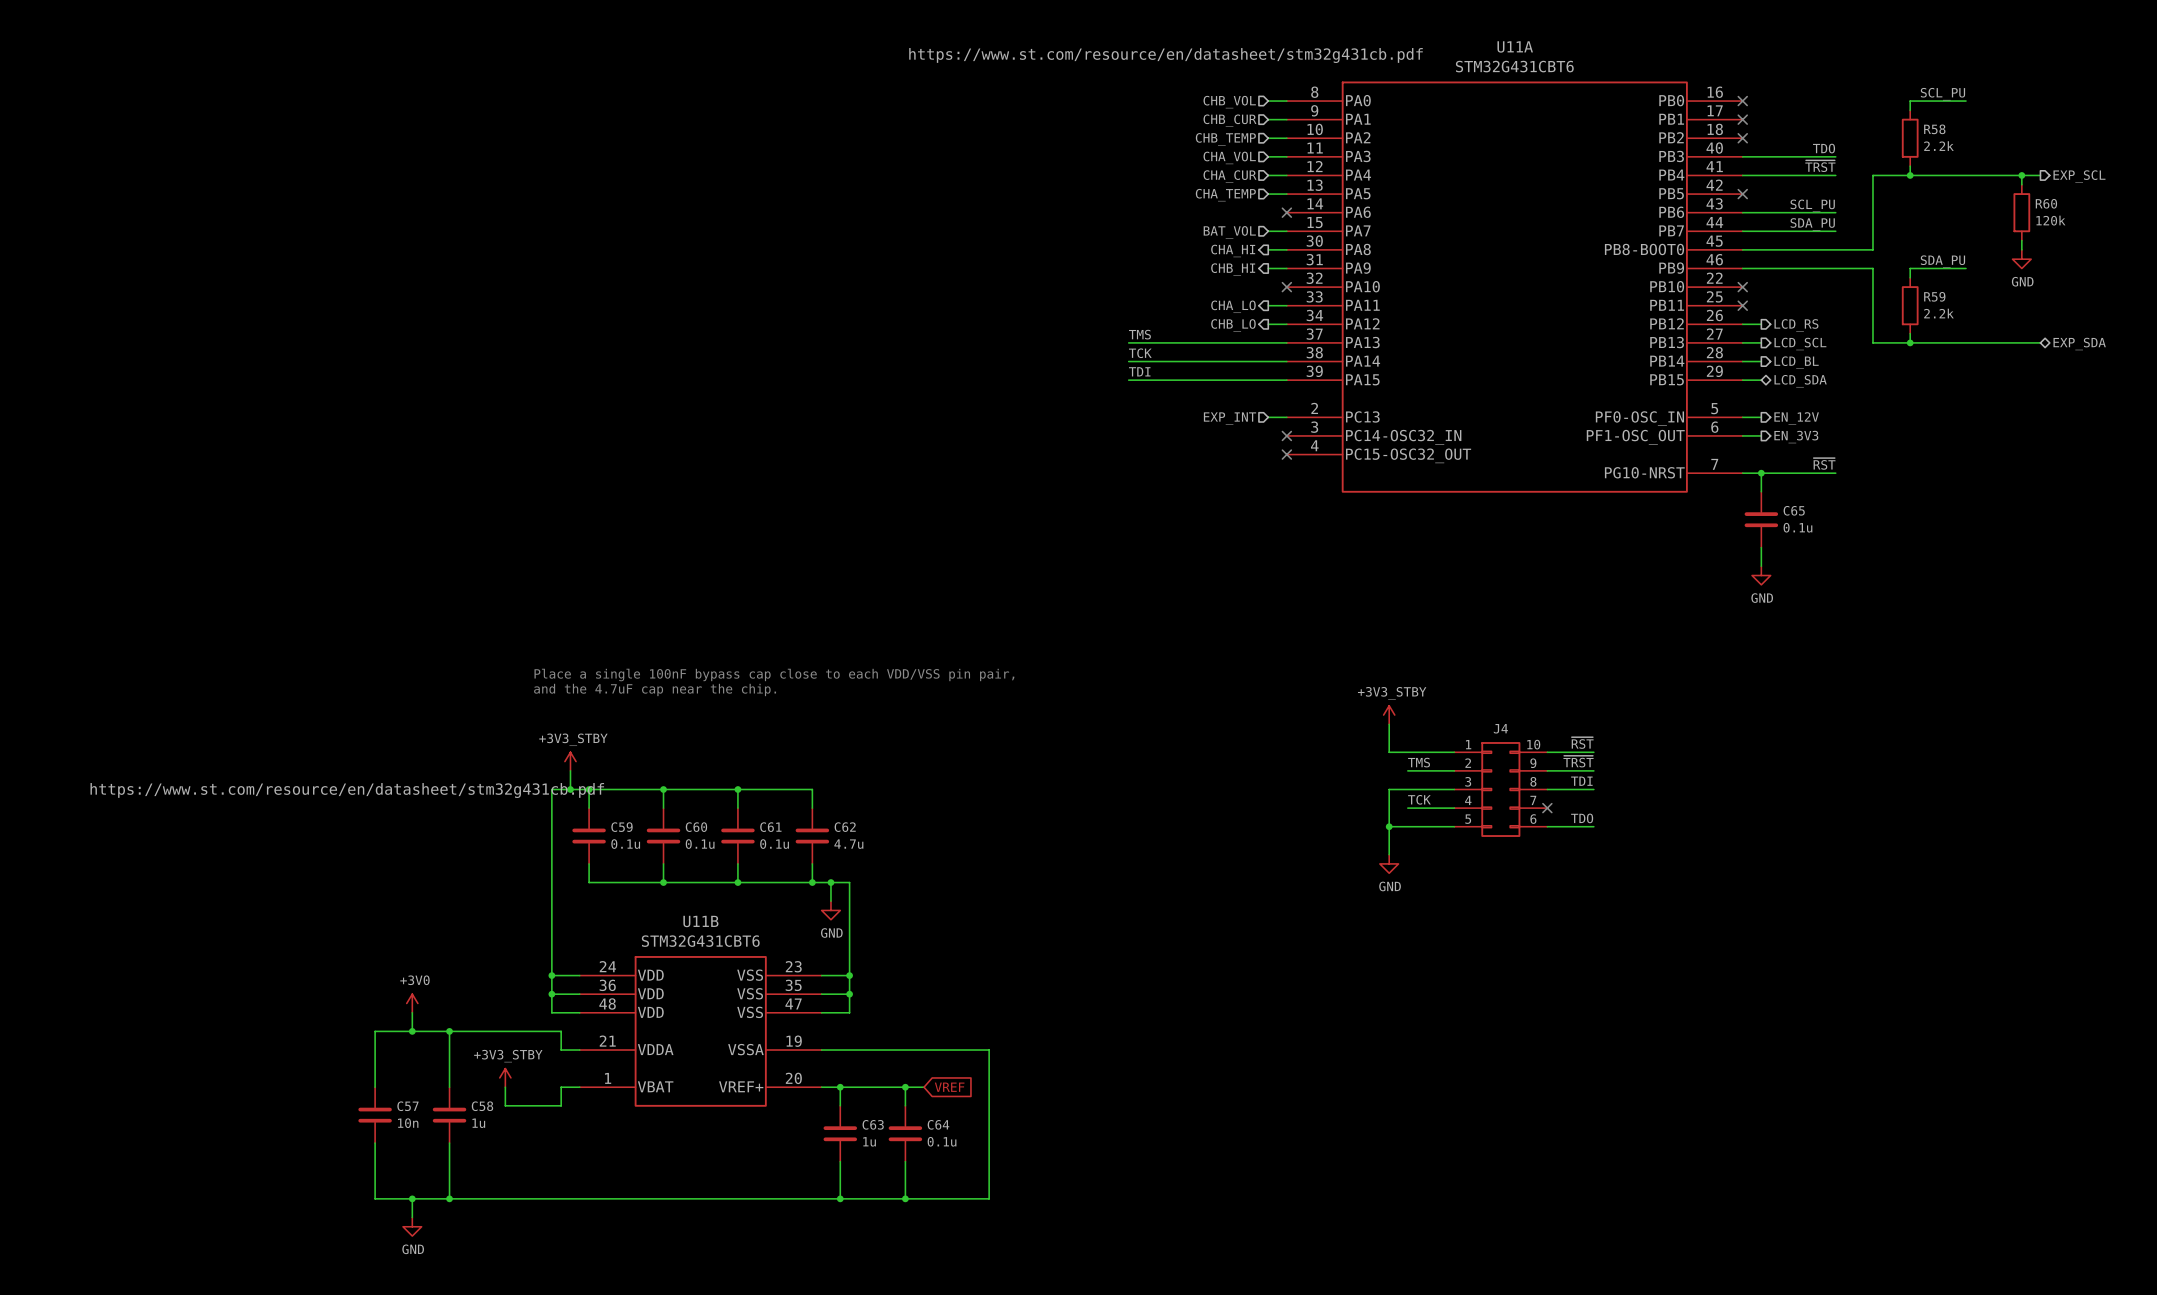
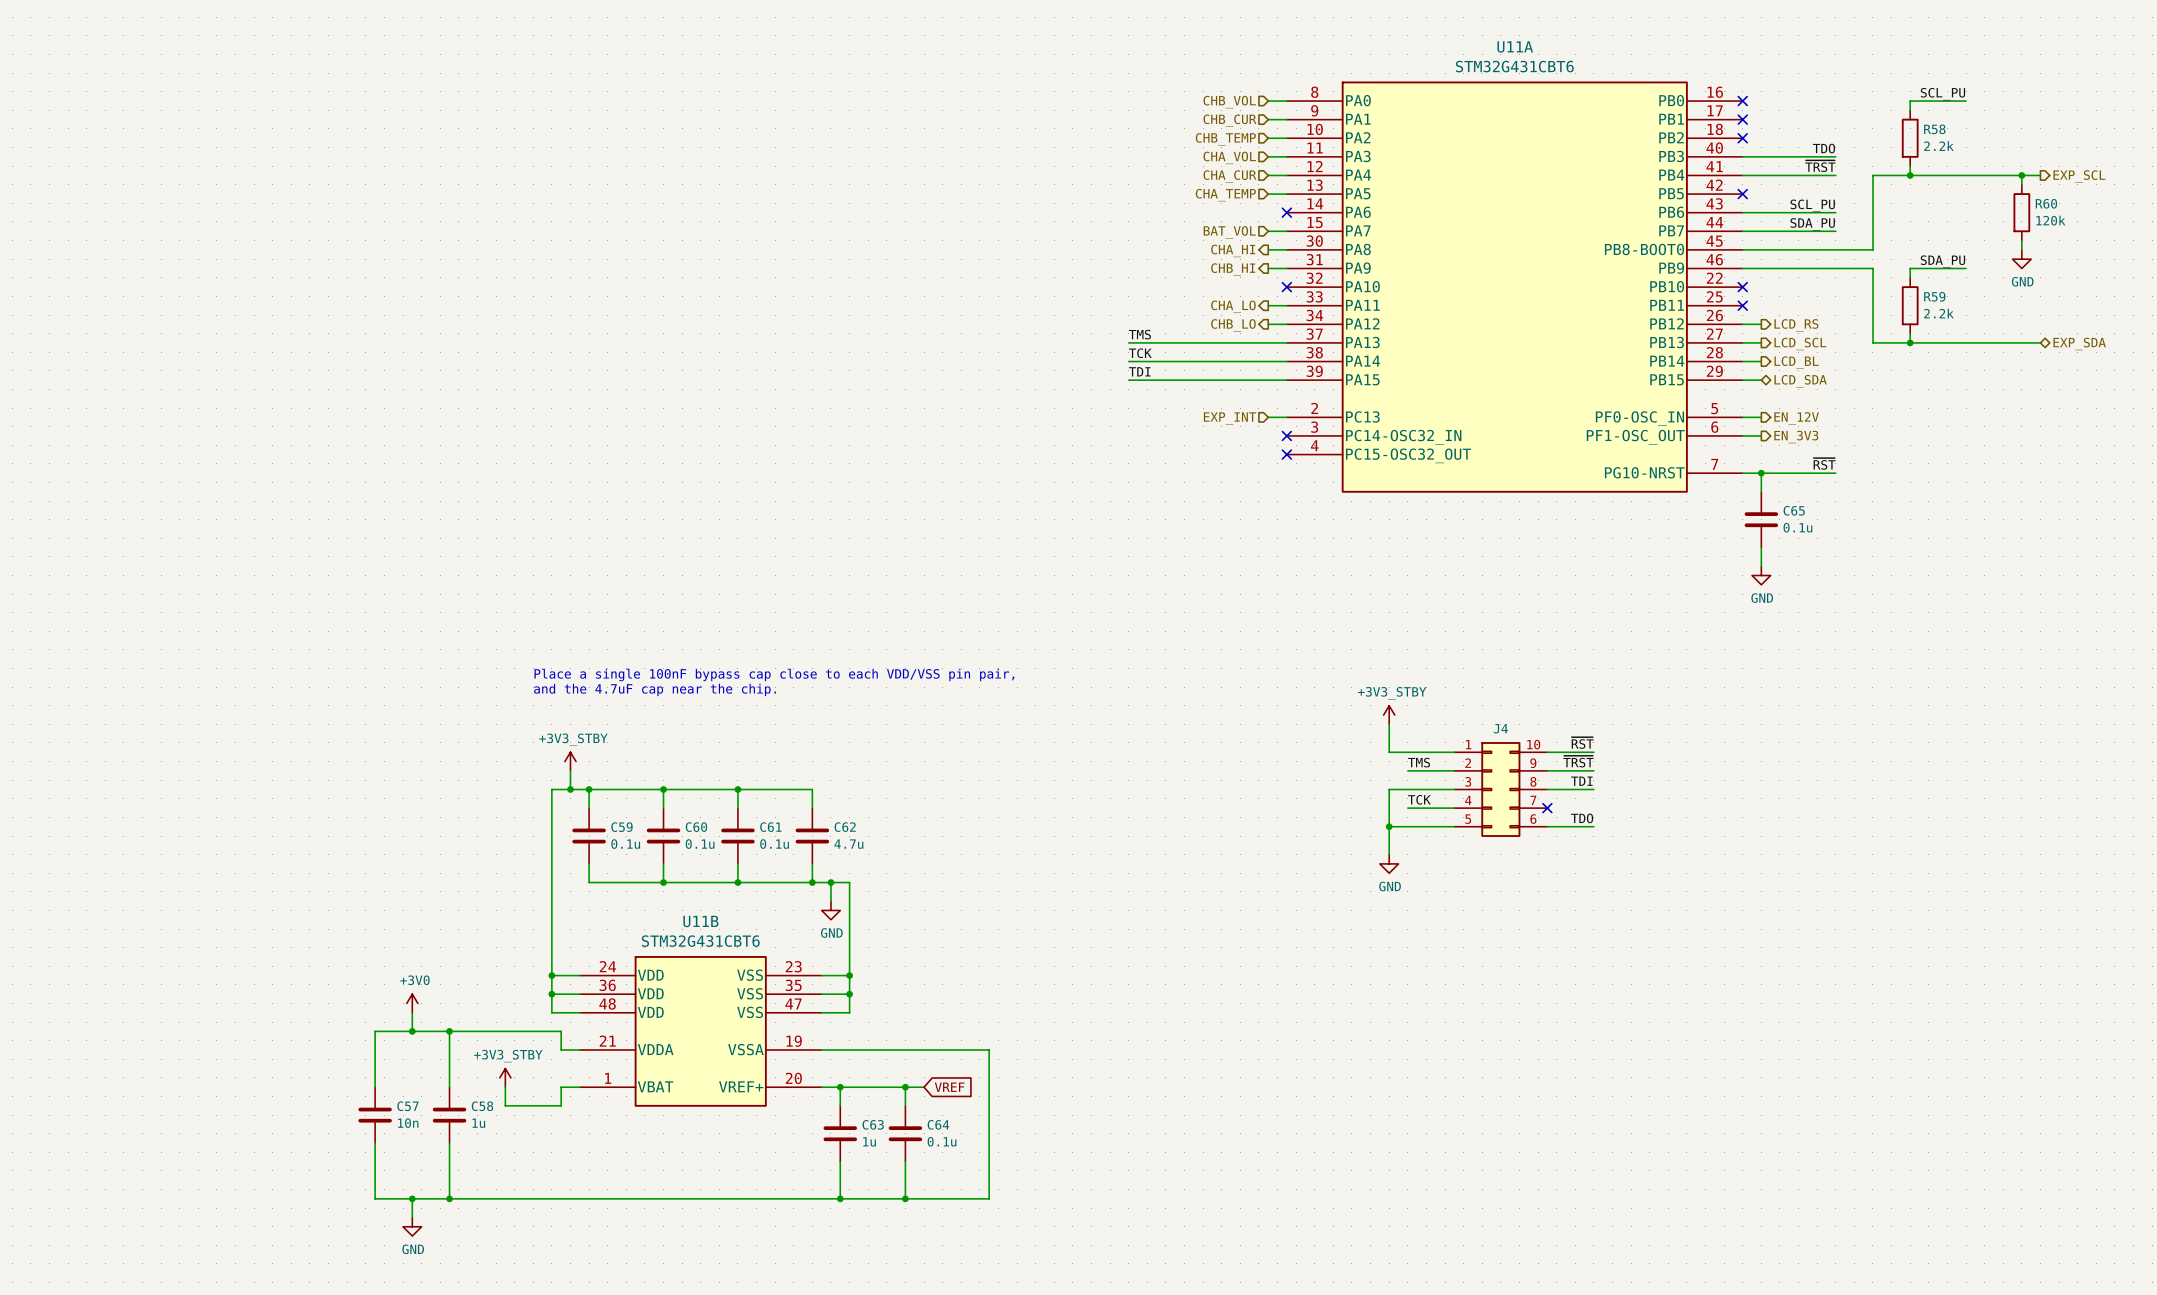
U11A text: https://www.st.com/resource/en/datasheet/stm32g431cb.pdf (1166, 55) -> none
U11B text: https://www.st.com/resource/en/datasheet/stm32g431cb.pdf (347, 790) -> none

